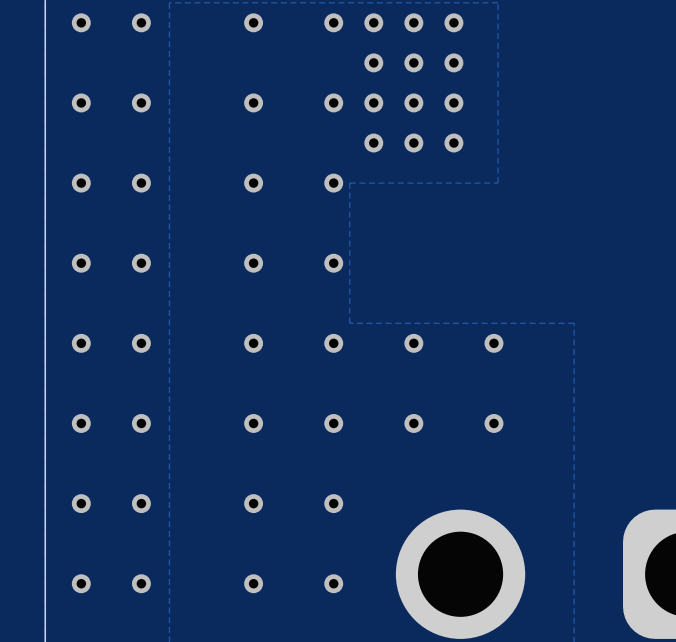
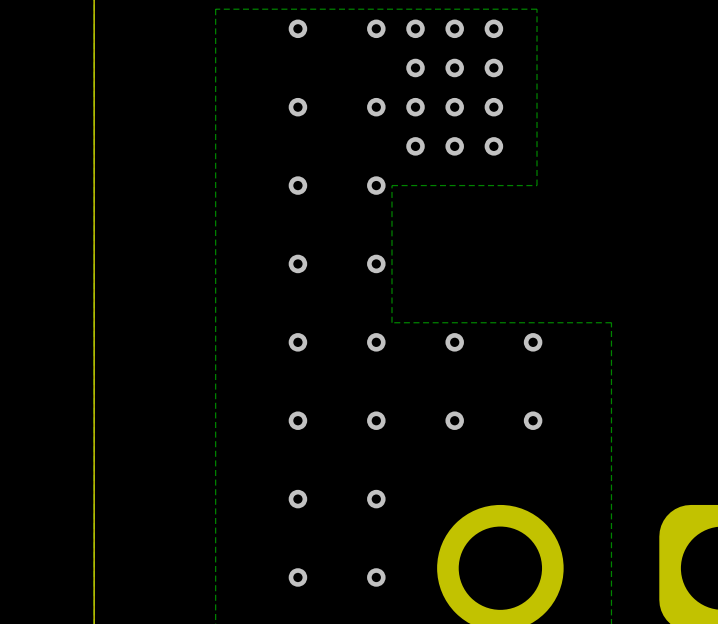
via: (81, 22) -> none
via: (141, 22) -> none
via: (81, 102) -> none
via: (141, 102) -> none
via: (81, 183) -> none
via: (141, 183) -> none
via: (81, 263) -> none
via: (141, 263) -> none
via: (81, 343) -> none
via: (141, 343) -> none
via: (81, 423) -> none
via: (141, 423) -> none
via: (81, 503) -> none
via: (141, 503) -> none
via: (81, 583) -> none
via: (141, 583) -> none

